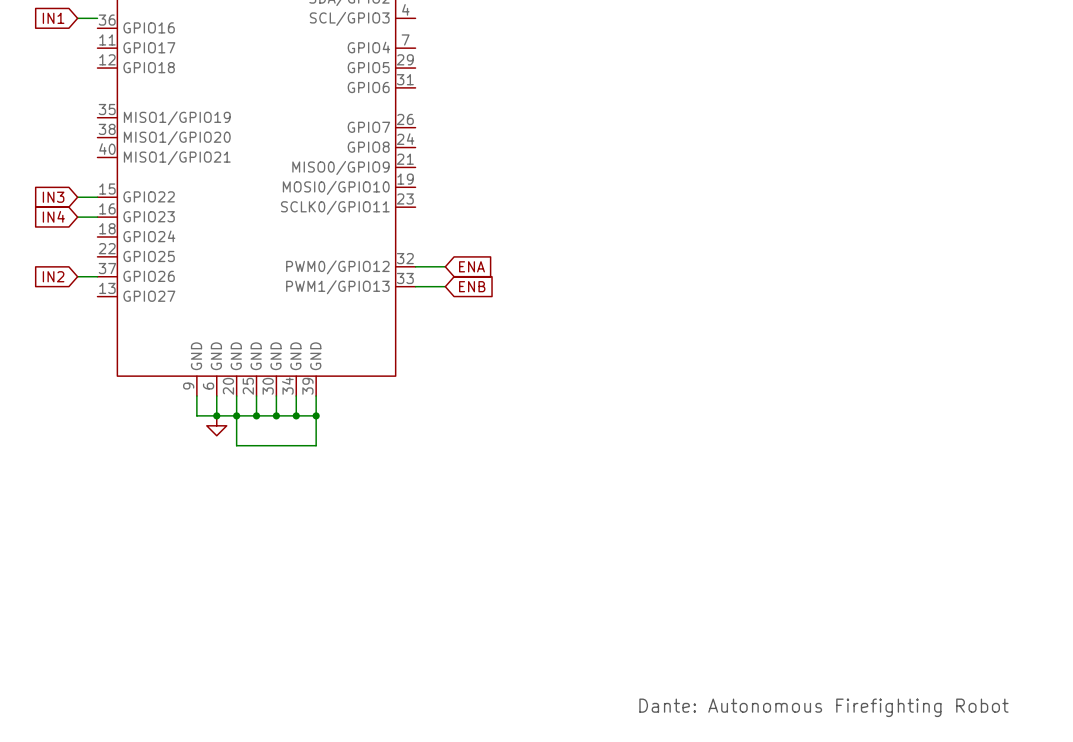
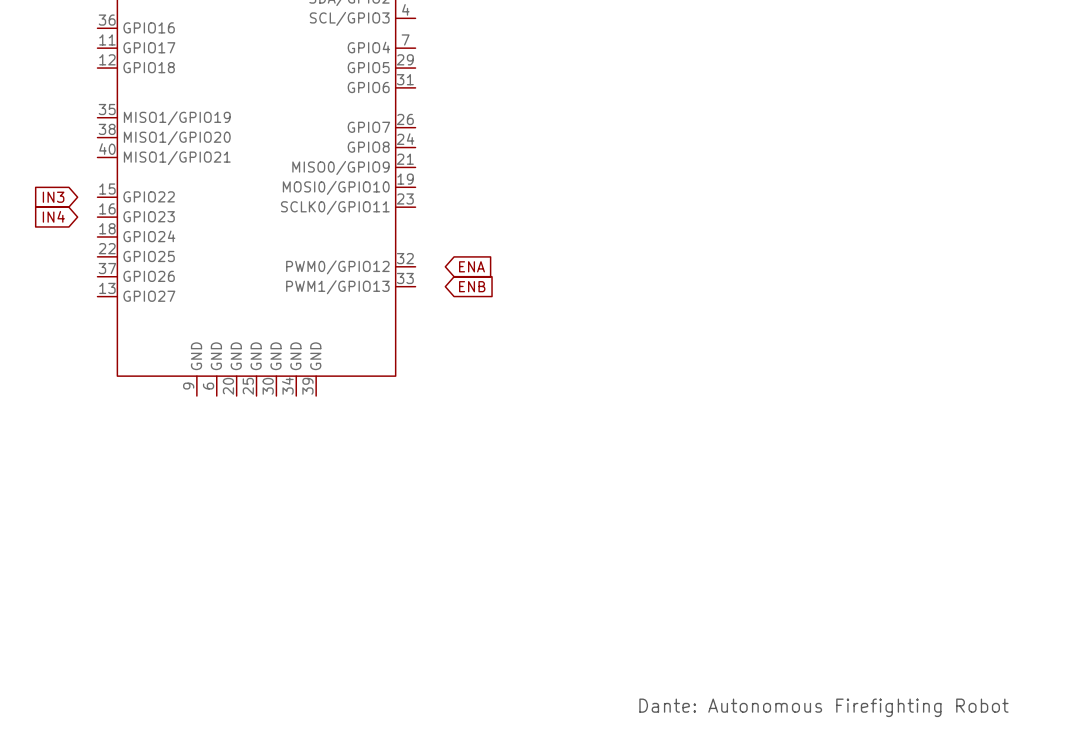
global label: IN1 (53, 18) -> none
wire: (77, 18) (97, 18) -> none
wire: (77, 197) (97, 197) -> none
wire: (77, 217) (97, 217) -> none
wire: (415, 266) (445, 266) -> none
global label: IN2 (53, 276) -> none
wire: (77, 276) (97, 276) -> none
wire: (415, 286) (445, 286) -> none
wire: (196, 396) (196, 415) (316, 415) -> none
wire: (216, 396) (216, 415) -> none
wire: (236, 396) (236, 445) (316, 445) (316, 396) -> none
wire: (256, 396) (256, 415) -> none
wire: (276, 396) (276, 415) -> none
wire: (296, 396) (296, 415) -> none
junction: (216, 415) -> none
junction: (236, 415) -> none
junction: (256, 415) -> none
junction: (276, 415) -> none
junction: (296, 415) -> none
junction: (316, 415) -> none
power symbol: (216, 425) -> none

